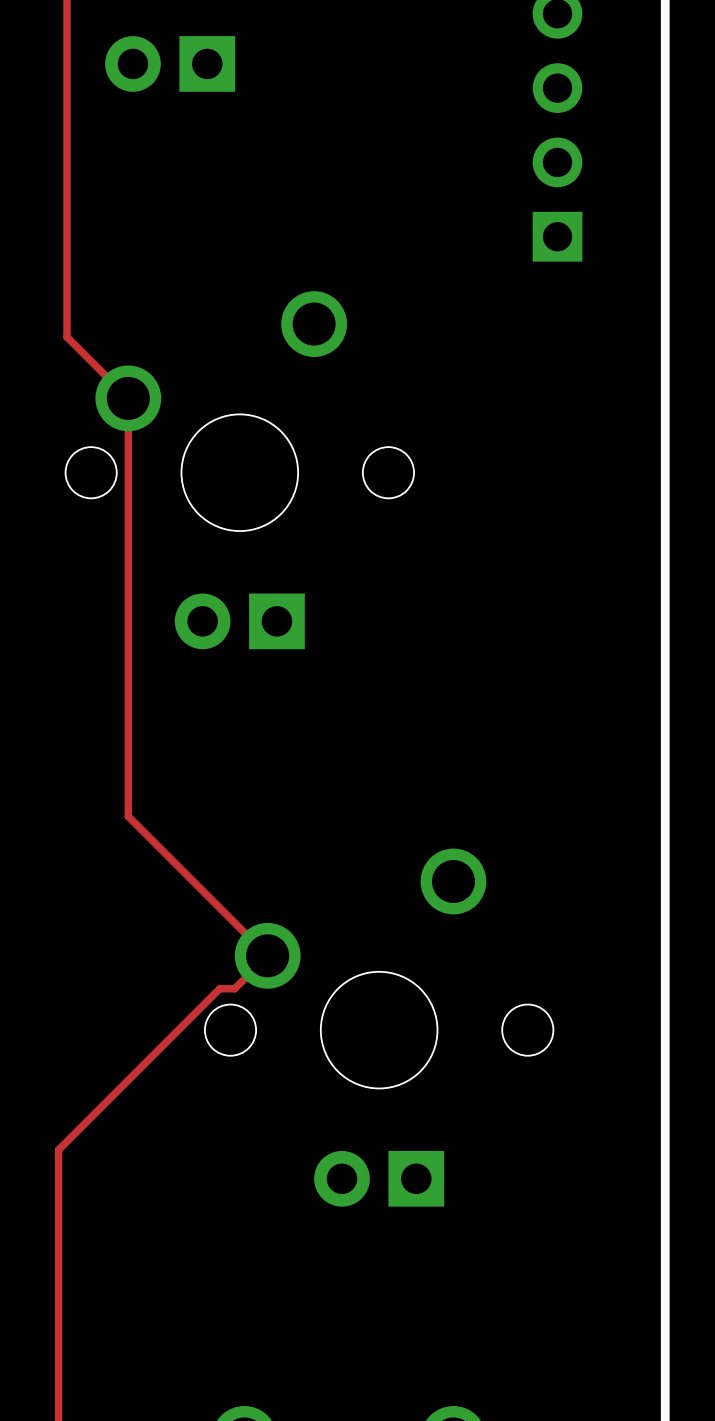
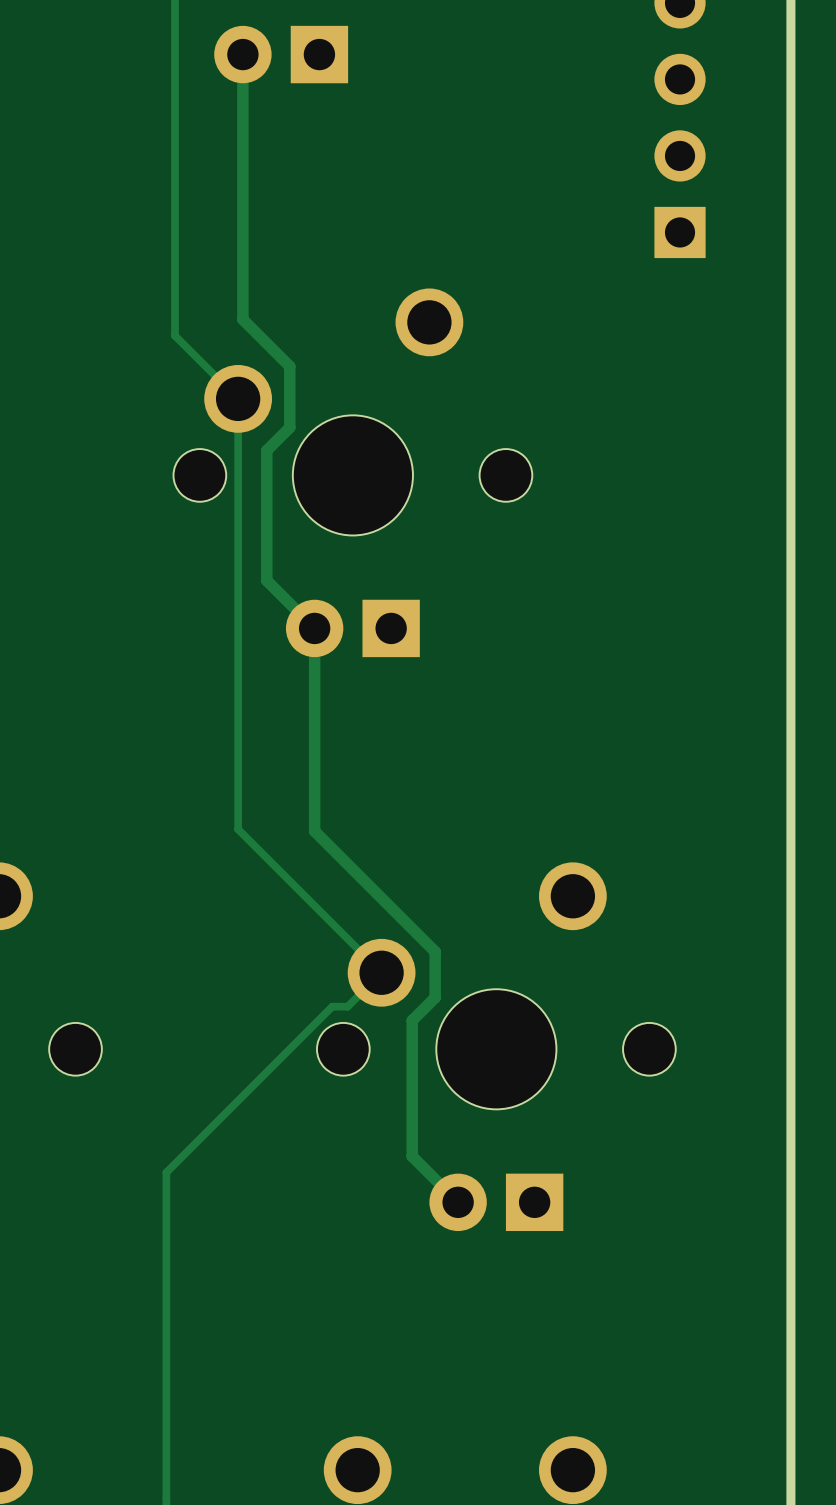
track: none -> (242, 54) (242, 319) (289, 366) (289, 427) (266, 450) (266, 580) (314, 628) (314, 831) (435, 951) (435, 997) (412, 1020) (412, 1156) (458, 1202)

